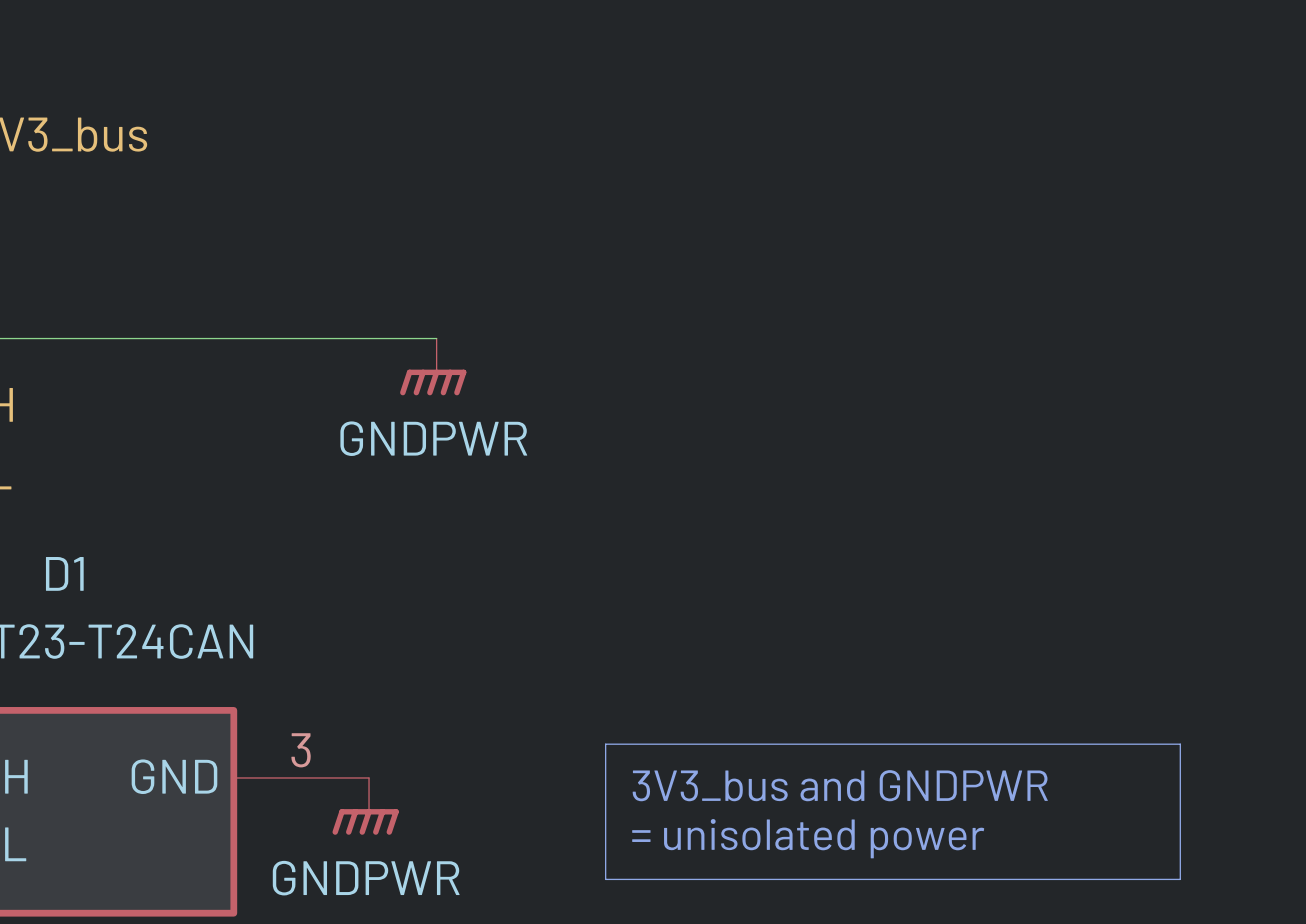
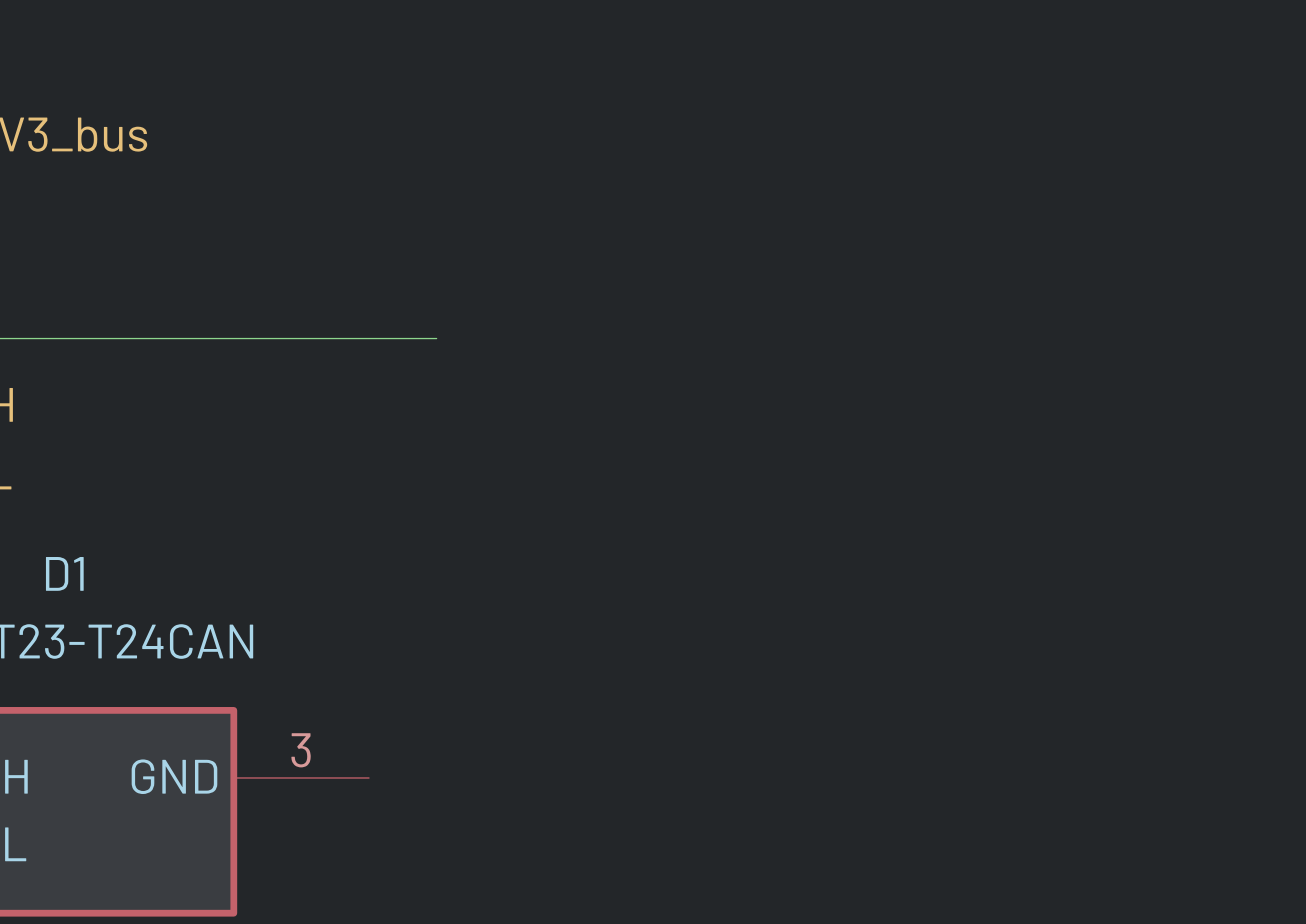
power symbol: GNDPWR (433, 366) -> none
line: (605, 744) (1180, 744) (1180, 879) (605, 879) (605, 744) -> none
text: 3V3_bus and GNDPWR (840, 785) -> none
power symbol: GNDPWR (365, 806) -> none
text: = unisolated power (808, 838) -> none

